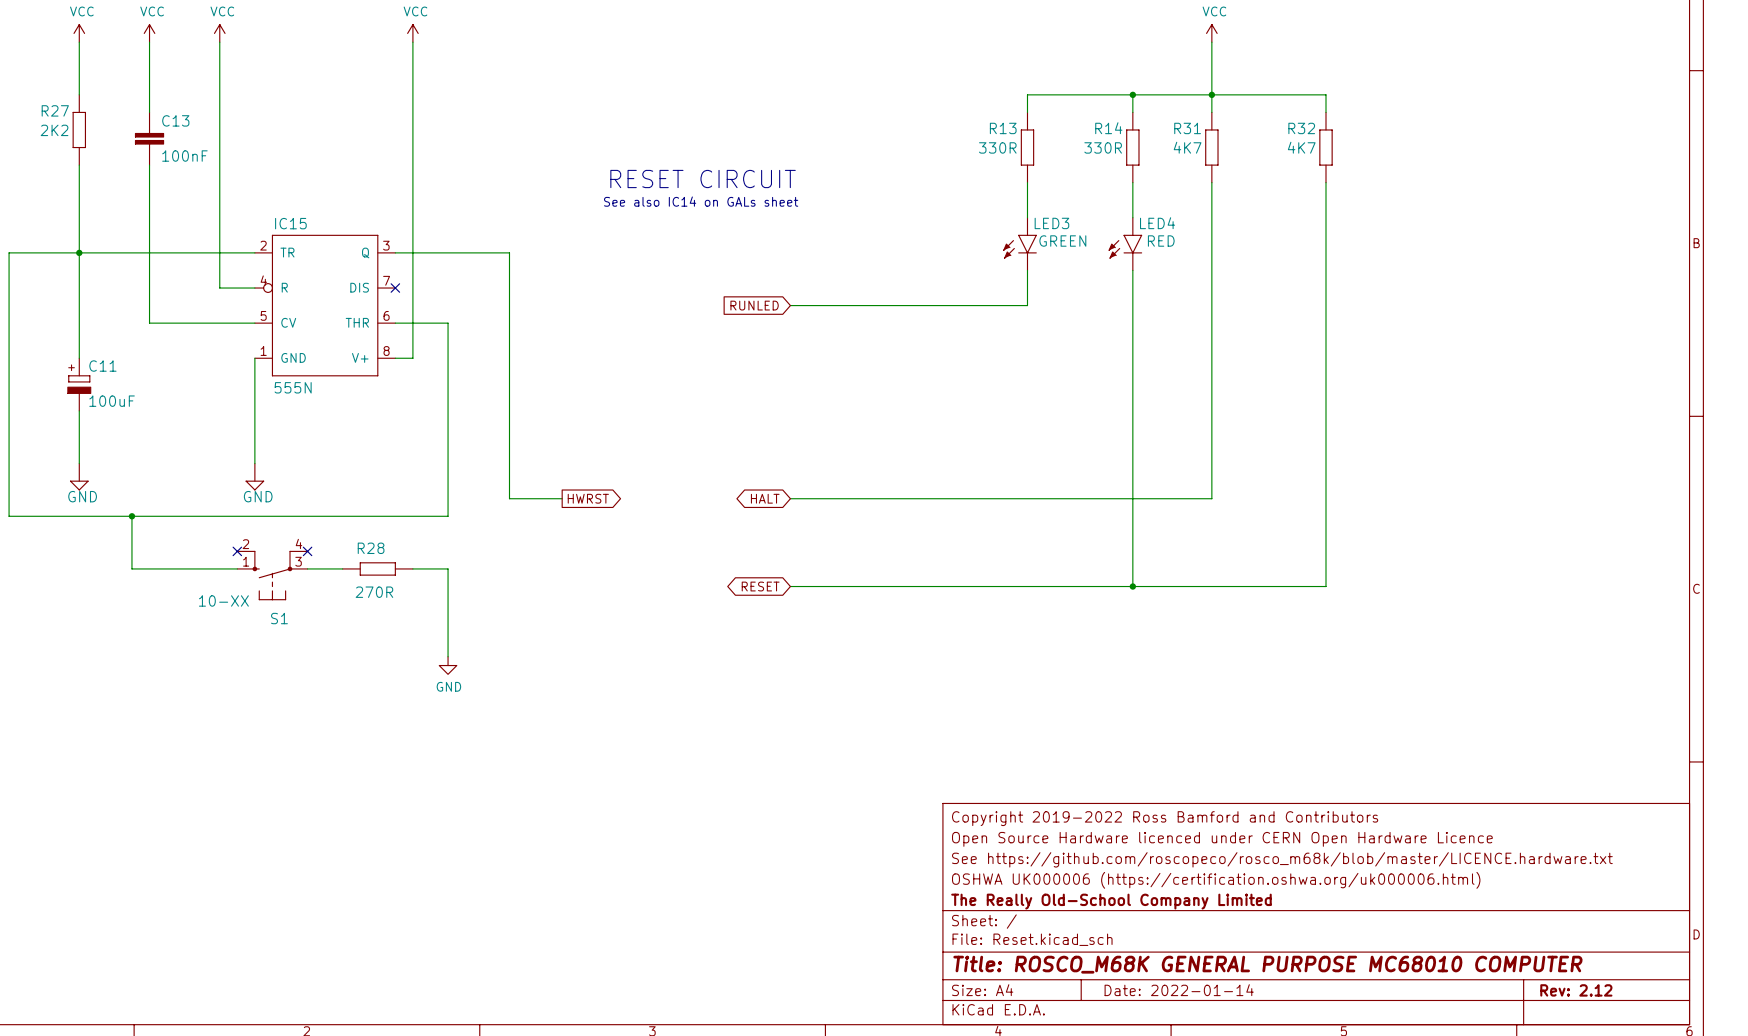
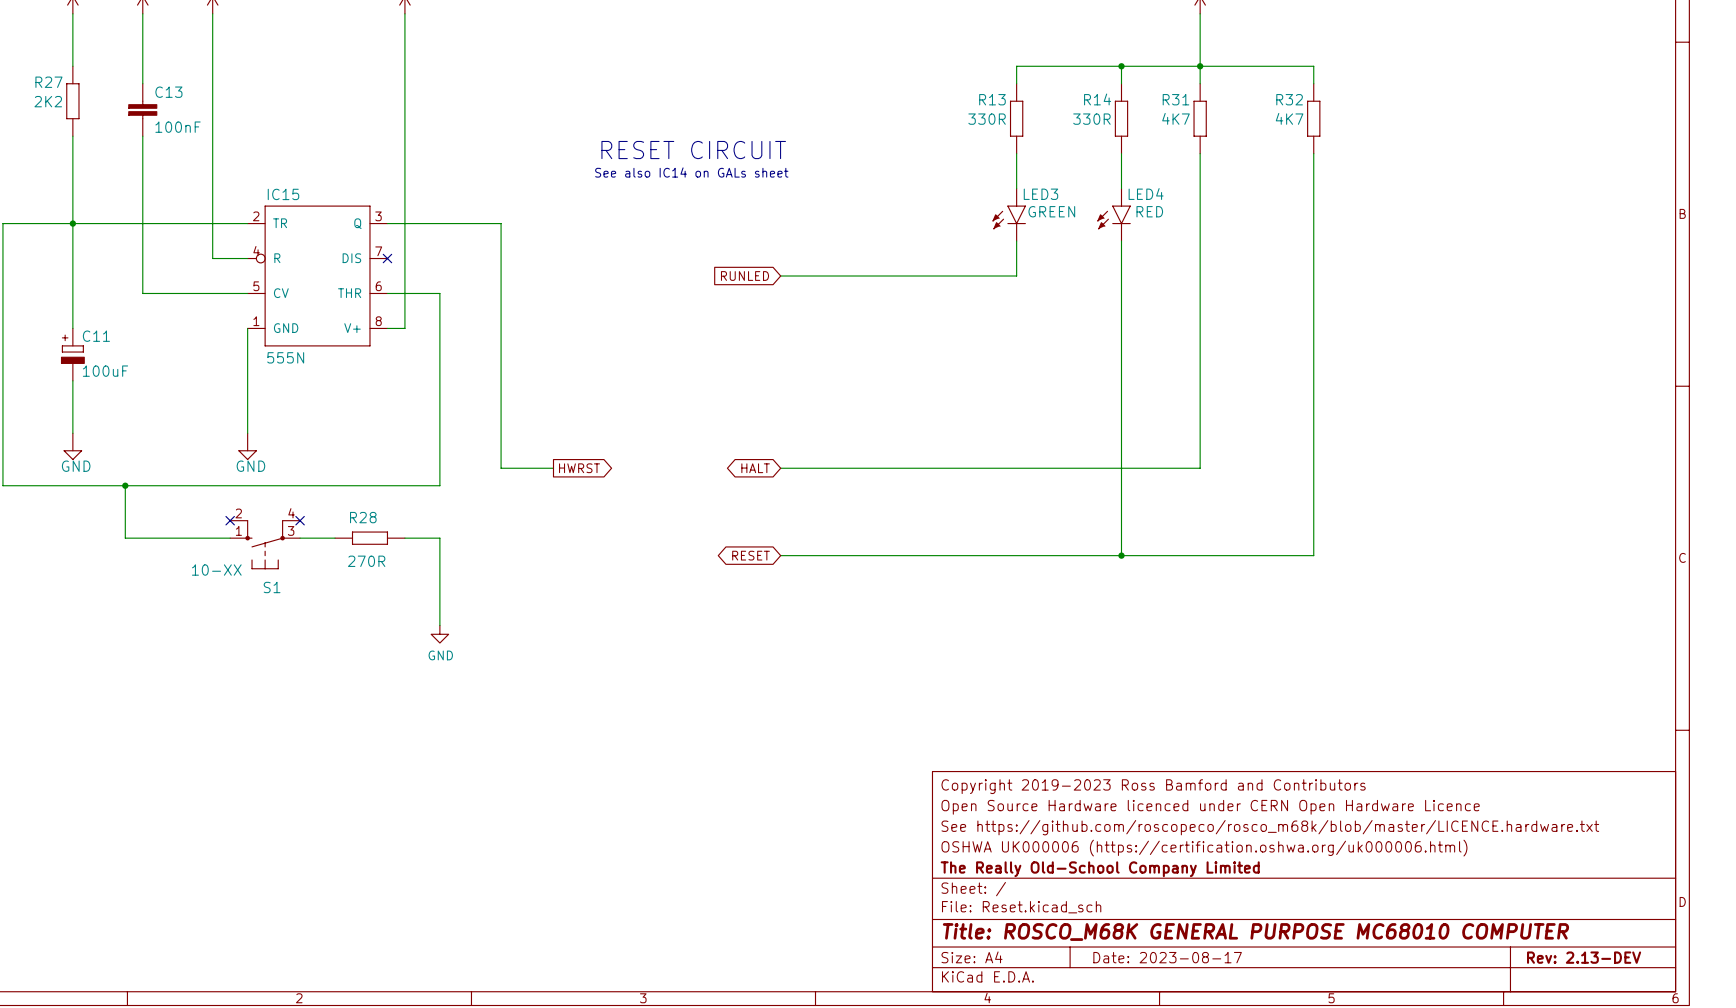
title block: Copyright 2019-2022 Ross Bamford and Contributors (1165, 818) -> Copyright 2019-2023 Ross Bamford and Contributors (1153, 786)
title block: Date: 2022-01-14 (1179, 990) -> Date: 2023-08-17 (1167, 957)
title block: Rev: 2.12 (1576, 990) -> Rev: 2.13-DEV (1584, 957)

